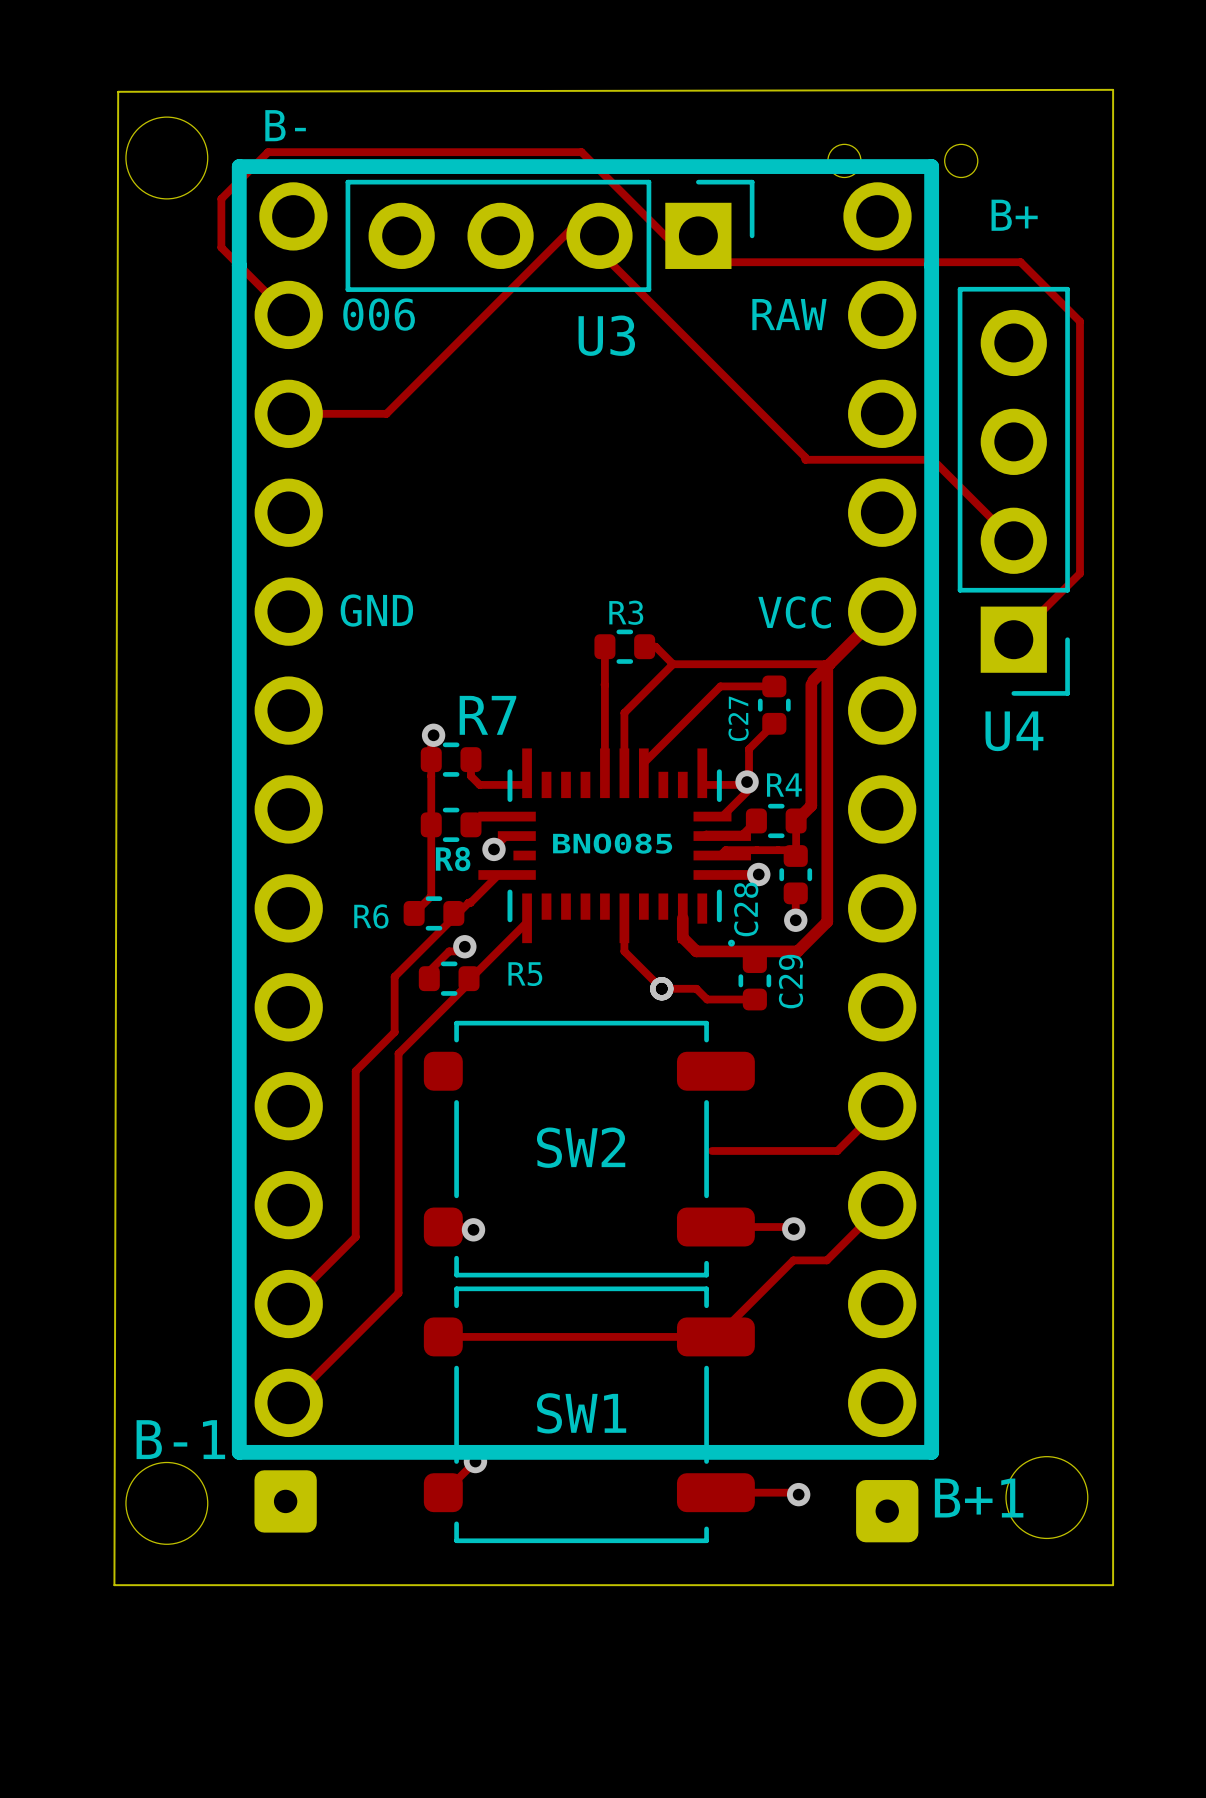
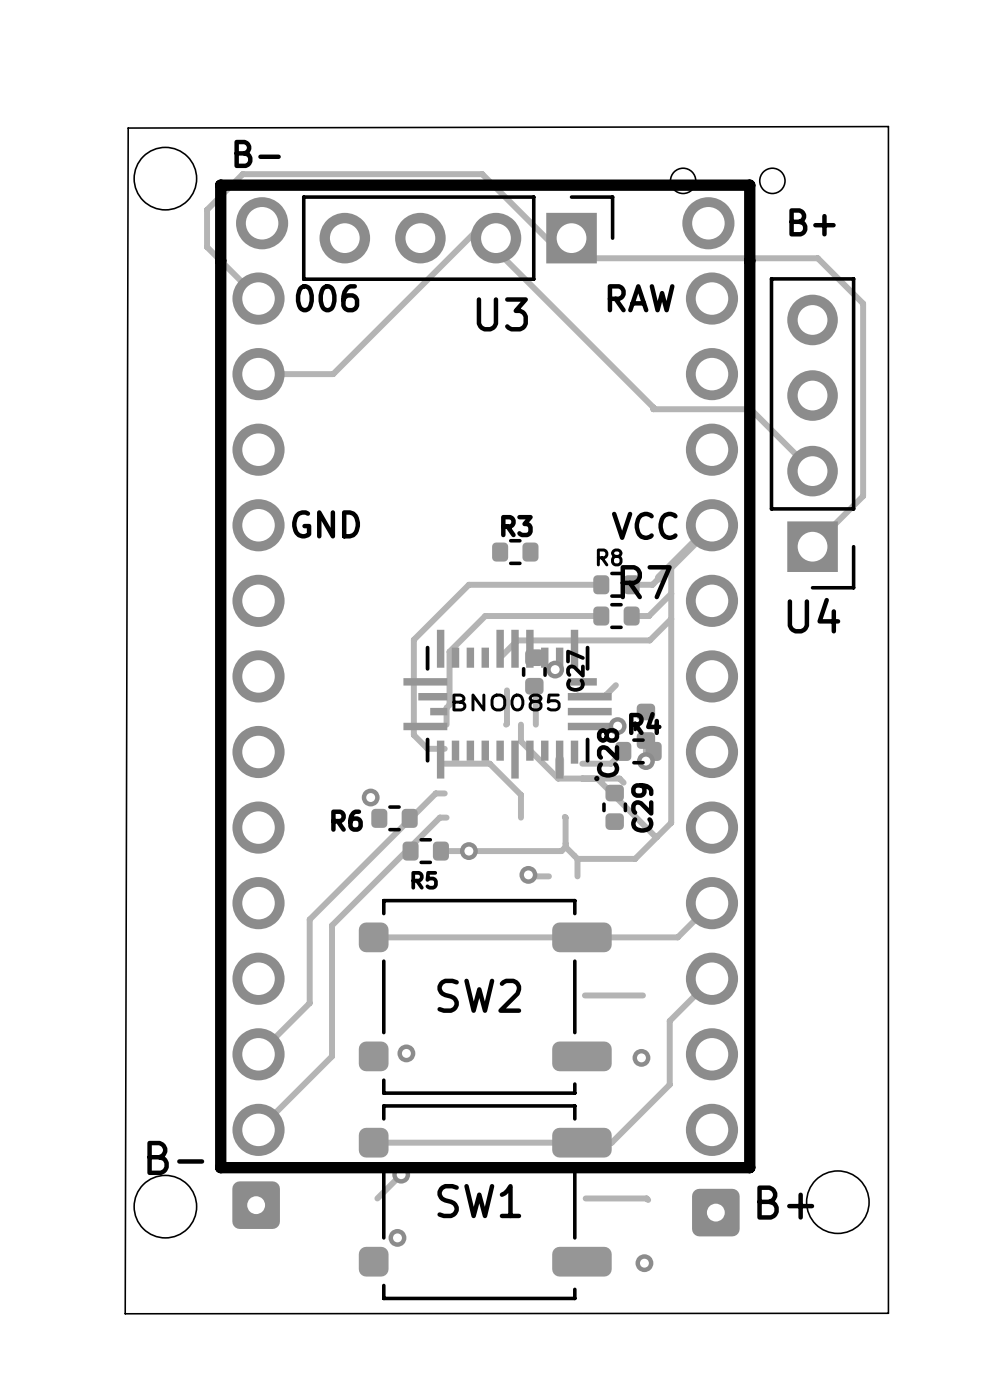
track: (604, 646) (604, 784) -> none
track: (644, 646) (655, 646) (673, 664) -> none
track: (673, 664) (824, 664) (827, 666) (827, 921) (797, 951) (696, 951) (682, 937) (682, 906) -> none
track: (673, 664) (624, 712) (624, 784) -> none
track: none -> (671, 566) (671, 822) (635, 858) (577, 858)
track: none -> (659, 577) (652, 584) (631, 584)
track: (811, 684) (811, 805) (796, 820) (796, 855) -> none
track: (774, 686) (720, 686) (643, 763) (643, 784) -> none
track: none -> (601, 584) (468, 584) (413, 639) (413, 735) (427, 748) (444, 748)
track: none -> (671, 593) (648, 616) (631, 616)
C27 position: (774, 705) -> (534, 671)
C27 name position: C27 (738, 718) -> C27 (575, 670)
track: (774, 723) (749, 749) (749, 780) (744, 784) (702, 784) -> none
track: none -> (601, 616) (485, 616) (449, 651) (449, 704) (446, 707) (446, 724)
track: none -> (671, 619) (649, 640) (517, 640) (501, 656)
track: (433, 735) (431, 737) (431, 896) (414, 913) -> none
via: (433, 735) -> none
R7 position: (451, 759) -> (616, 616)
track: (470, 759) (470, 776) (479, 784) (527, 784) -> none
via position: (747, 782) -> (555, 669)
track: (747, 791) (722, 816) (704, 816) -> none
R4 position: (776, 820) -> (638, 751)
track: none -> (536, 685) (535, 724)
R8 position: (451, 824) -> (616, 584)
track: none -> (506, 690) (506, 724)
via: (493, 849) -> none
track: (704, 855) (720, 855) (725, 850) (789, 850) (795, 856) -> none
R8 name position: R8 (453, 859) -> R8 (609, 557)
track: none -> (520, 724) (520, 741) (558, 778) (619, 778) (623, 782)
track: (524, 874) (498, 874) (394, 976) (394, 1032) (355, 1071) (355, 1127) -> (444, 793) (435, 793) (309, 919)
track: (527, 906) (527, 922) (469, 978) (469, 983) (398, 1053) (398, 1293) (384, 1306) -> (446, 817) (439, 817) (332, 925) (332, 1056)
track: (624, 906) (624, 951) (661, 988) (696, 988) (707, 999) (754, 999) -> none
track: none -> (623, 751) (611, 763) (582, 763)
R6 position: (433, 913) -> (394, 818)
track: none -> (444, 763) (489, 763) (520, 794) (520, 817)
track: none -> (597, 778) (657, 836)
track: (464, 946) (460, 951) (449, 951) (429, 971) (429, 978) -> none
via position: (464, 946) -> (370, 797)
R5 name position: R5 (525, 974) -> R5 (424, 880)
R5 position: (449, 978) -> (425, 851)
via: (661, 988) -> none
track: none -> (564, 816) (565, 846)
track: none -> (565, 846) (577, 858)
track: none -> (565, 846) (561, 851) (440, 851)
via: none -> (468, 851)
track: none -> (577, 858) (577, 876)
track: none -> (528, 874) (548, 876)
via: none -> (528, 874)
SW2 position: (589, 1149) -> (485, 996)
track: none -> (373, 937) (581, 937)
via position: (793, 1228) -> (641, 1057)
via position: (473, 1229) -> (406, 1053)
track: (826, 1260) (793, 1260) (716, 1336) (444, 1336) -> (669, 1020) (669, 1084) (611, 1142) (373, 1142)
SW1 position: (589, 1414) -> (485, 1202)
B-1 name: B-1 (180, 1439) -> B- (175, 1157)
via position: (798, 1494) -> (644, 1263)
B+1 name: B+1 (979, 1498) -> B+ (785, 1202)
via: none -> (397, 1237)
board edge: (114, 1585) (1113, 1585) -> (125, 1269) (125, 1313) (888, 1313) (888, 1269)

